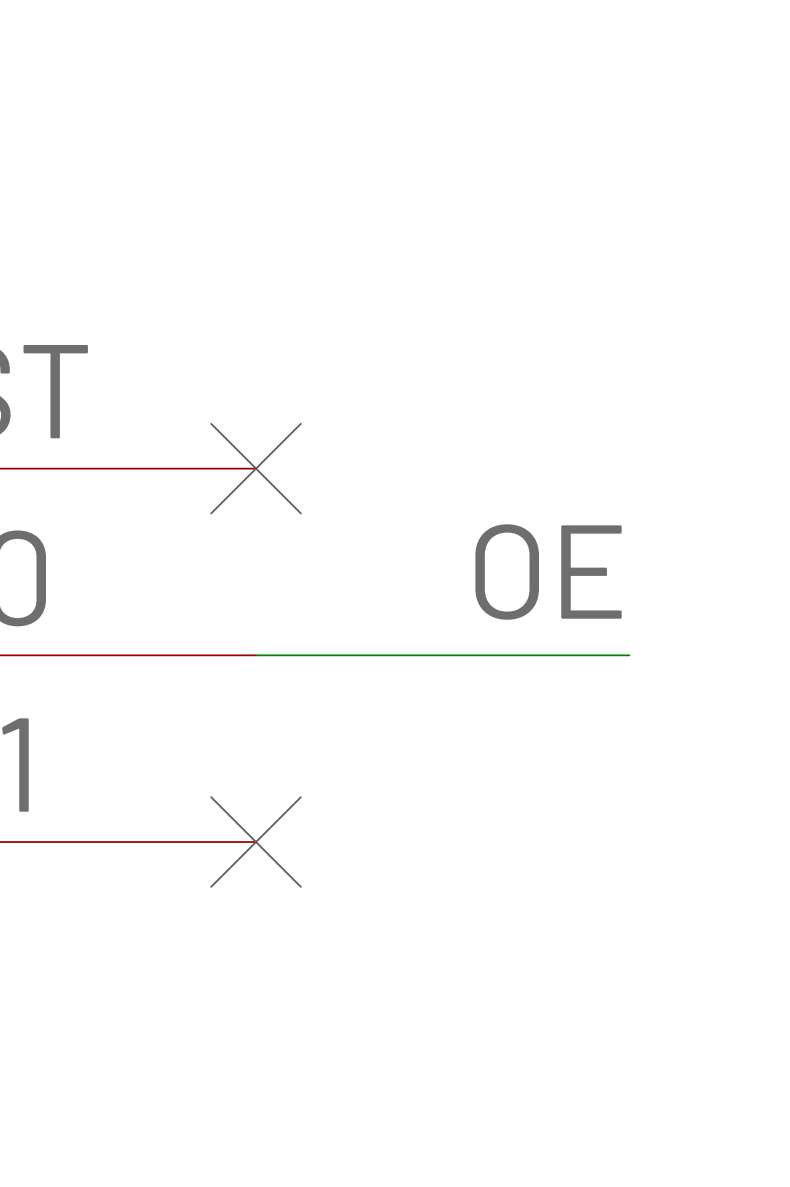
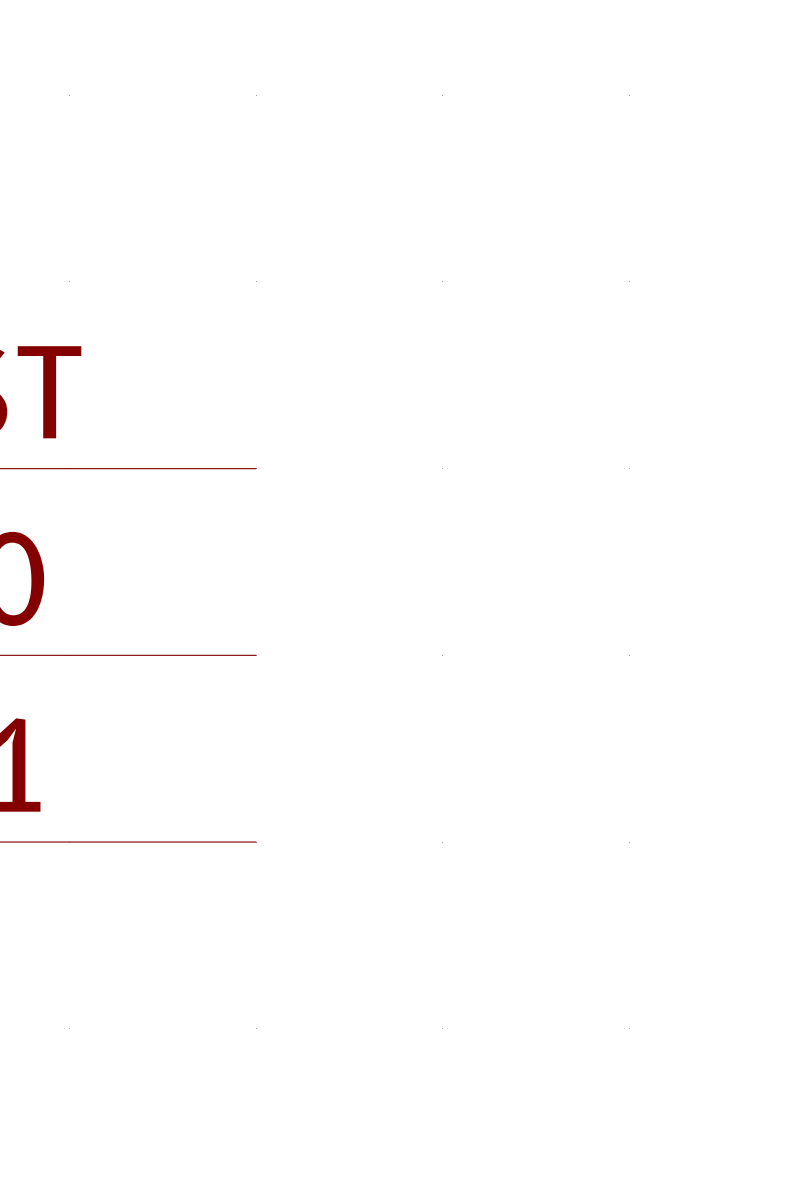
no-connect mark: (256, 468) -> none
label: OE (548, 572) -> none
wire: (256, 655) (629, 655) -> none
no-connect mark: (256, 842) -> none

